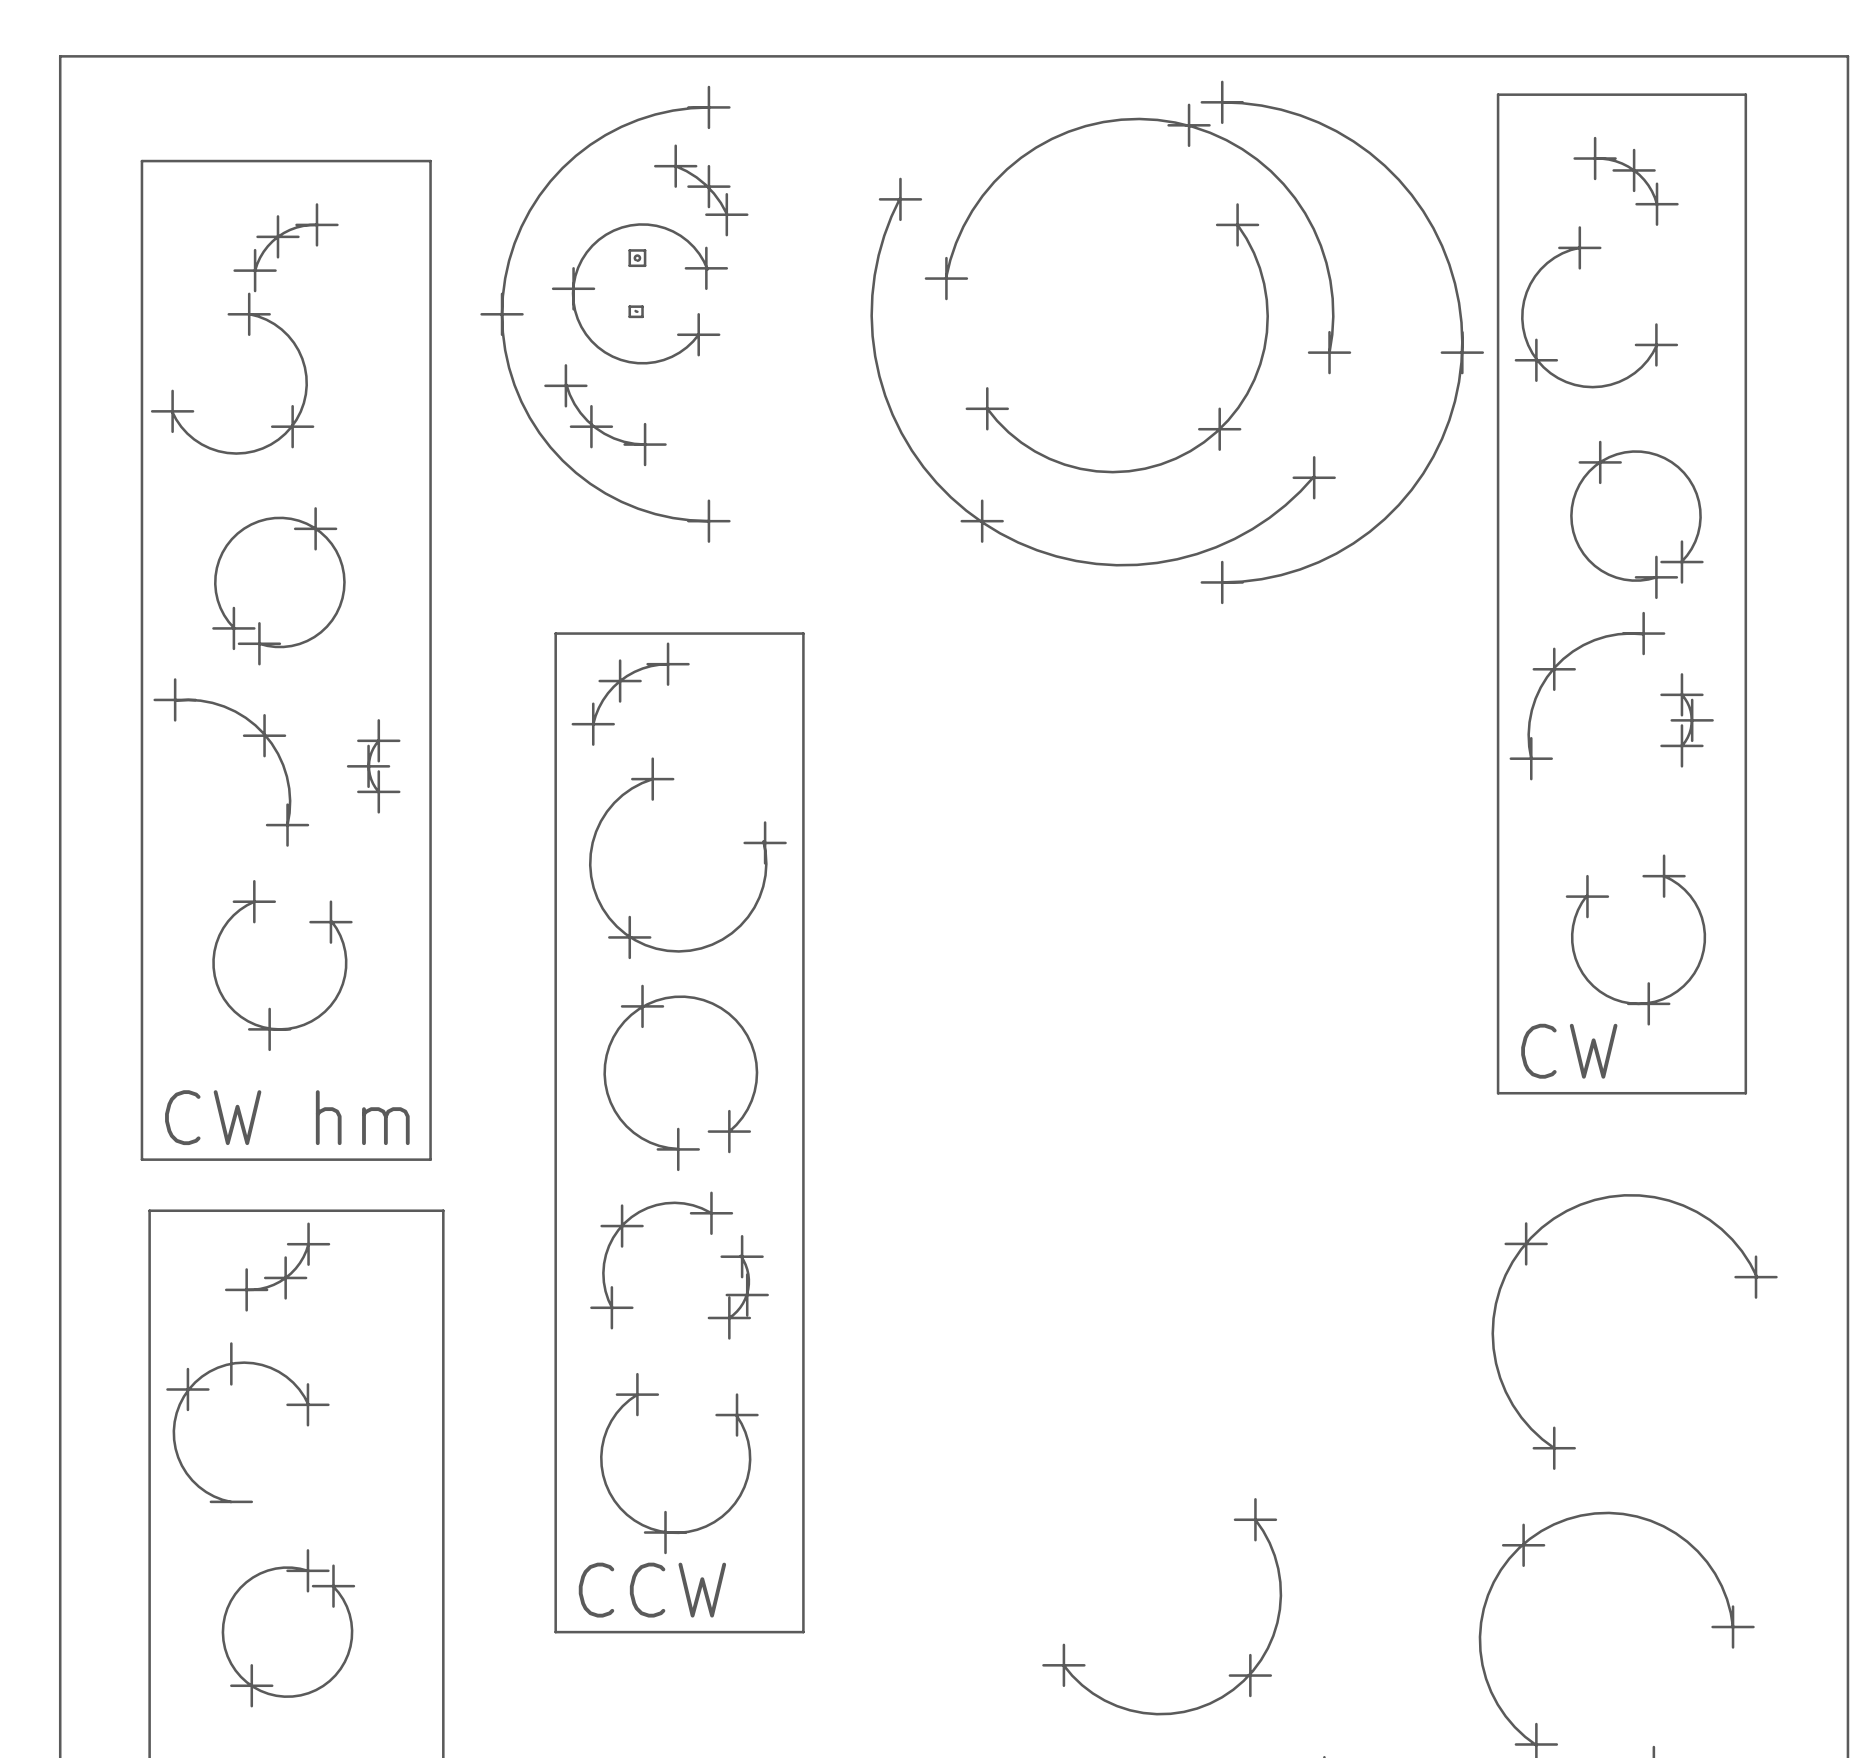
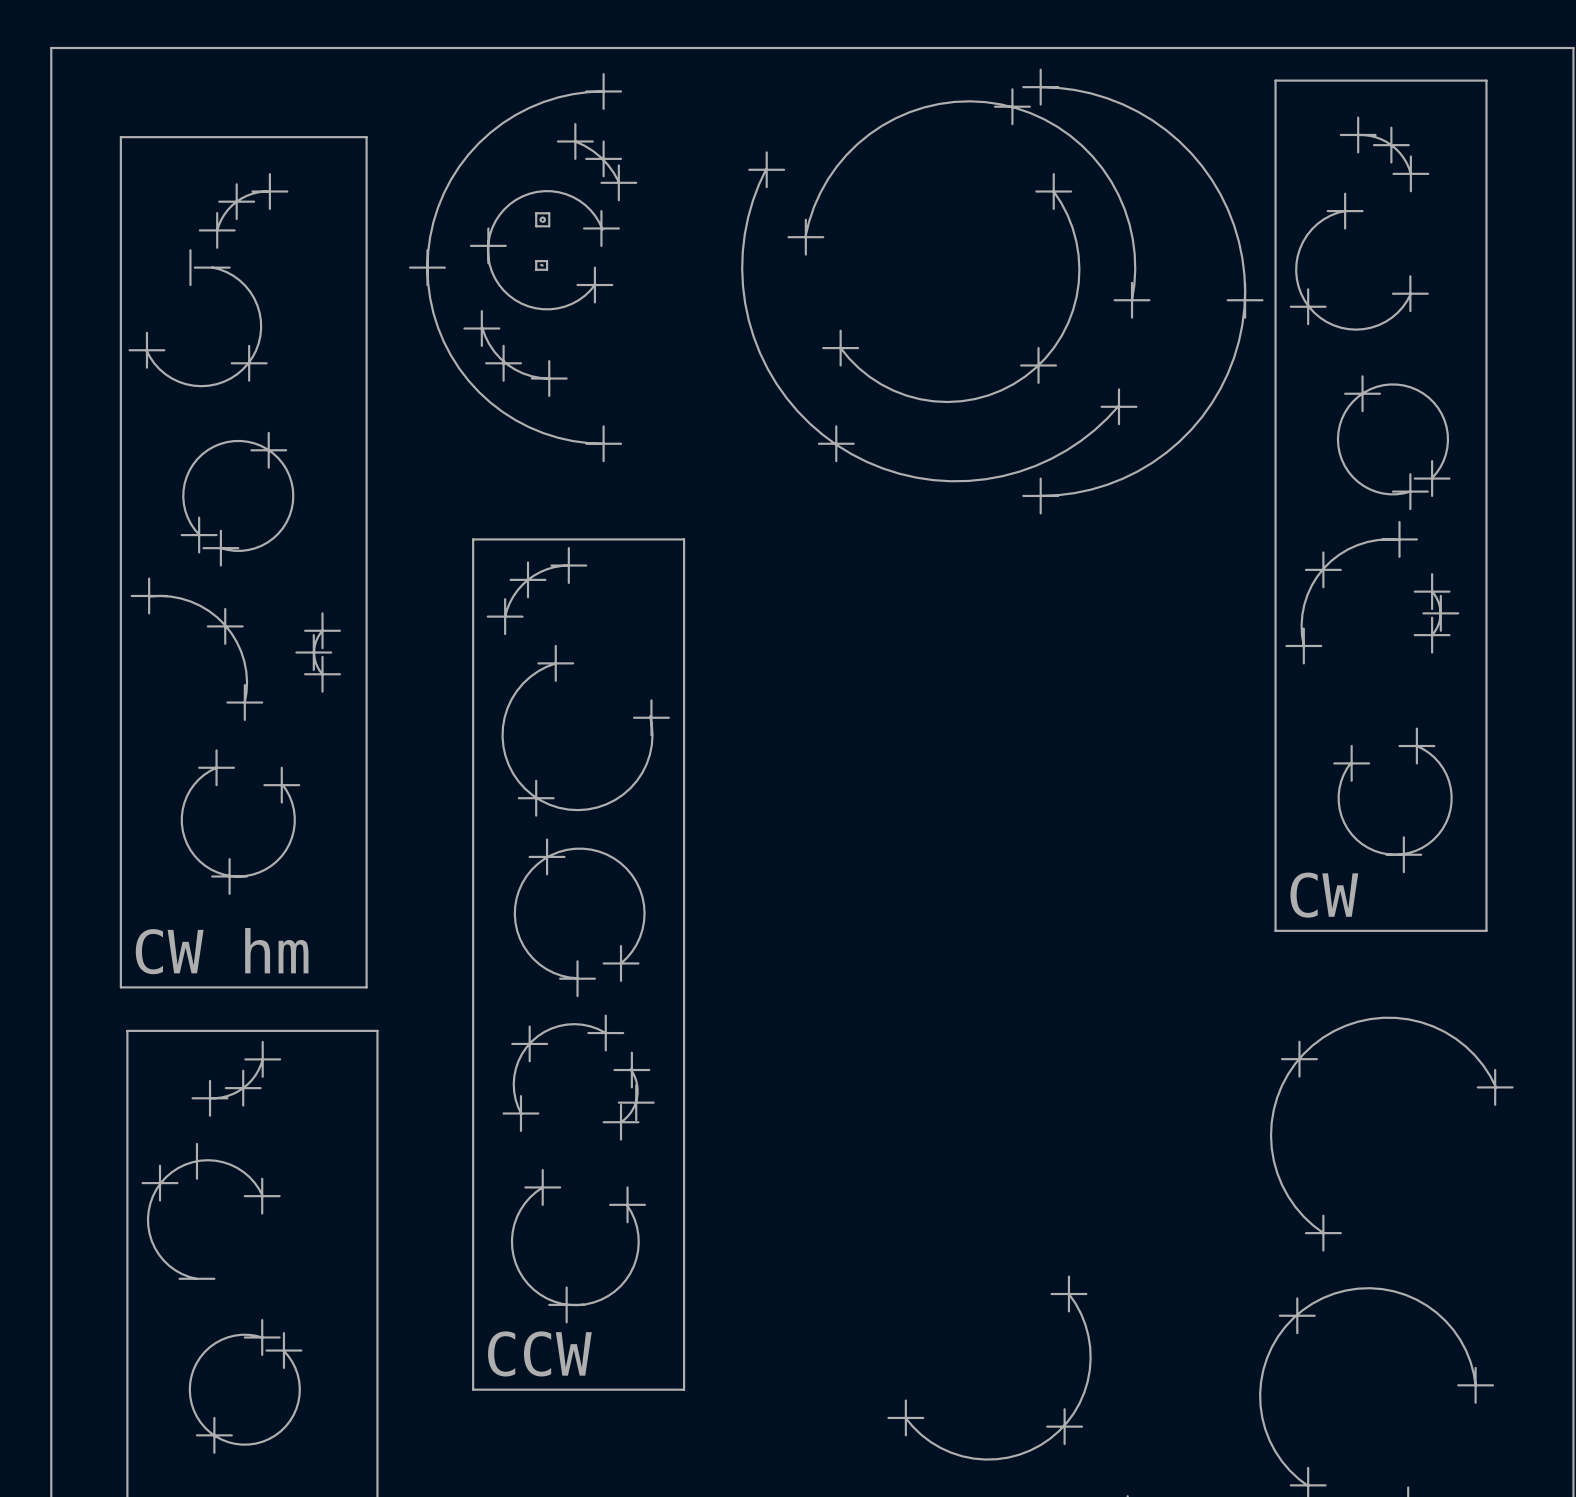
line: (249, 293) (249, 334) -> (190, 250) (190, 285)

